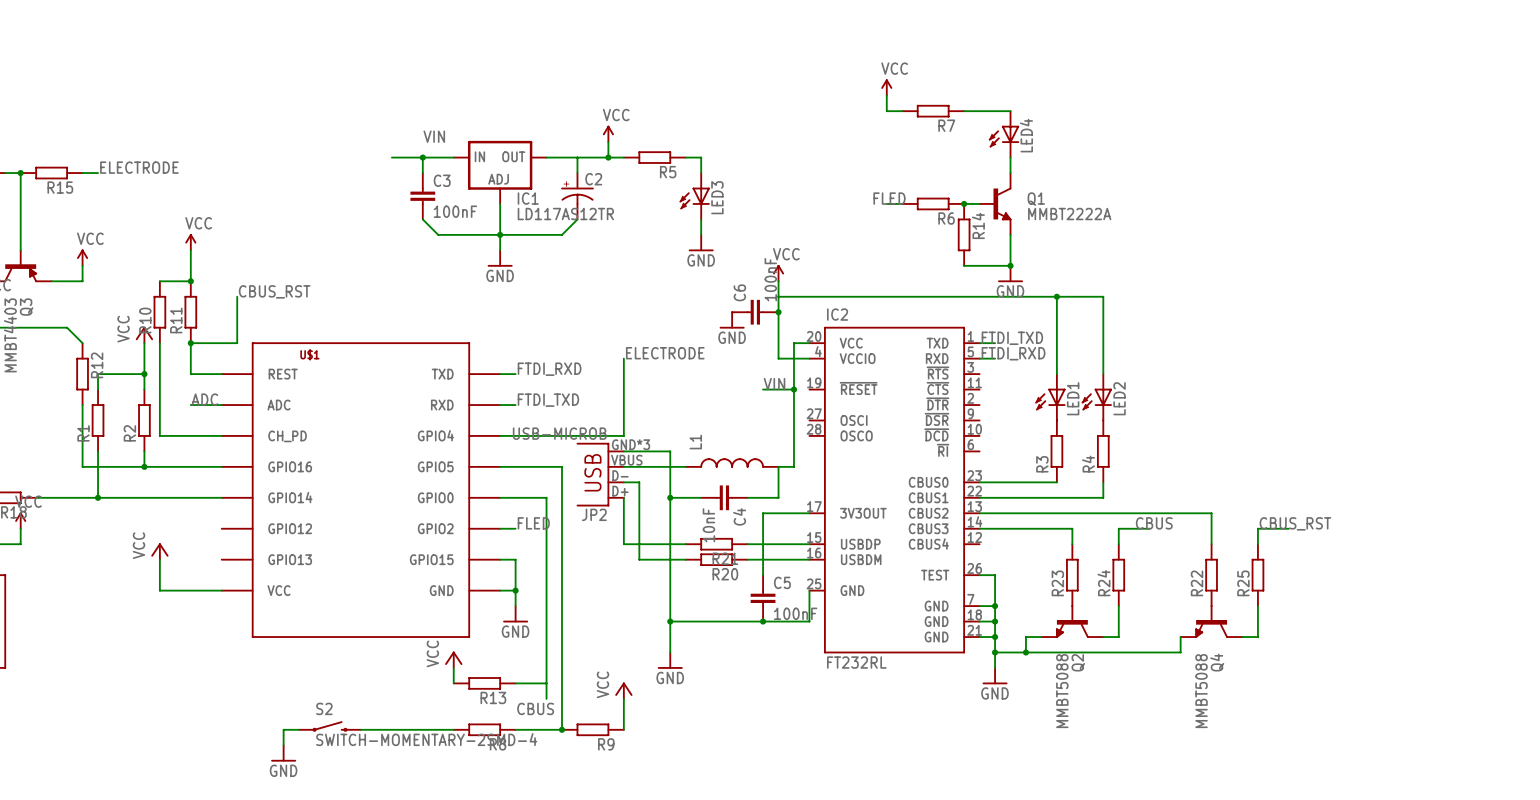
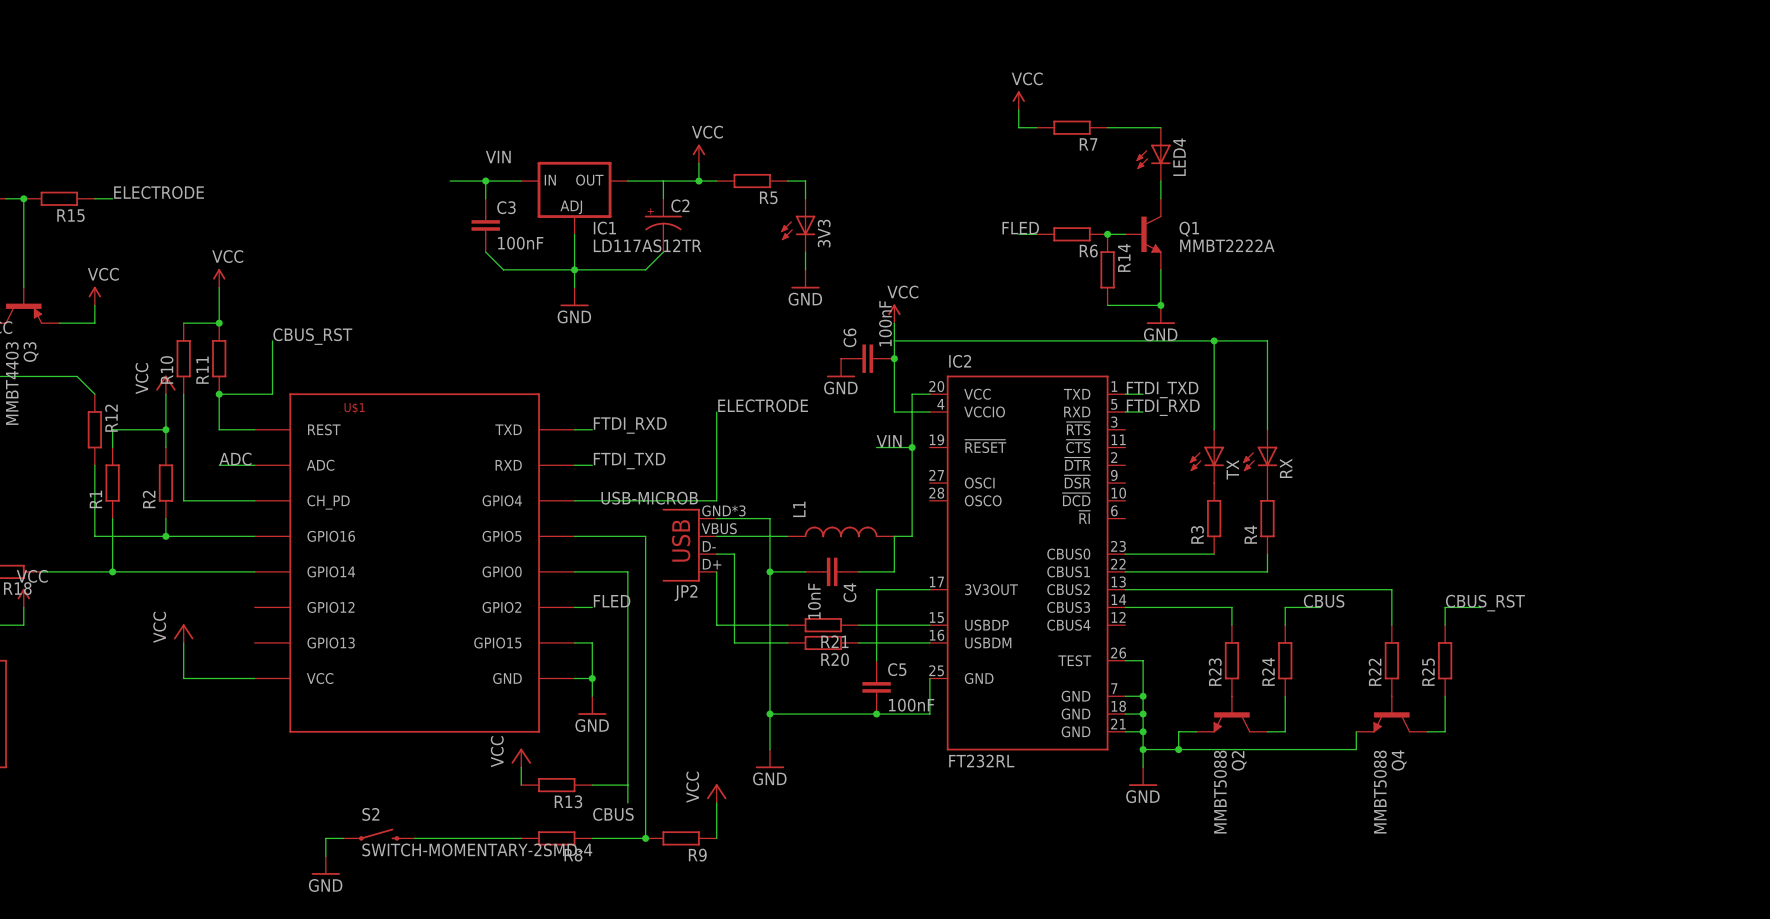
LED3 name: LED3 (717, 197) -> 3V3 (824, 233)
LED1 name: LED1 (1073, 398) -> TX (1232, 469)
LED2 name: LED2 (1119, 398) -> RX (1286, 468)

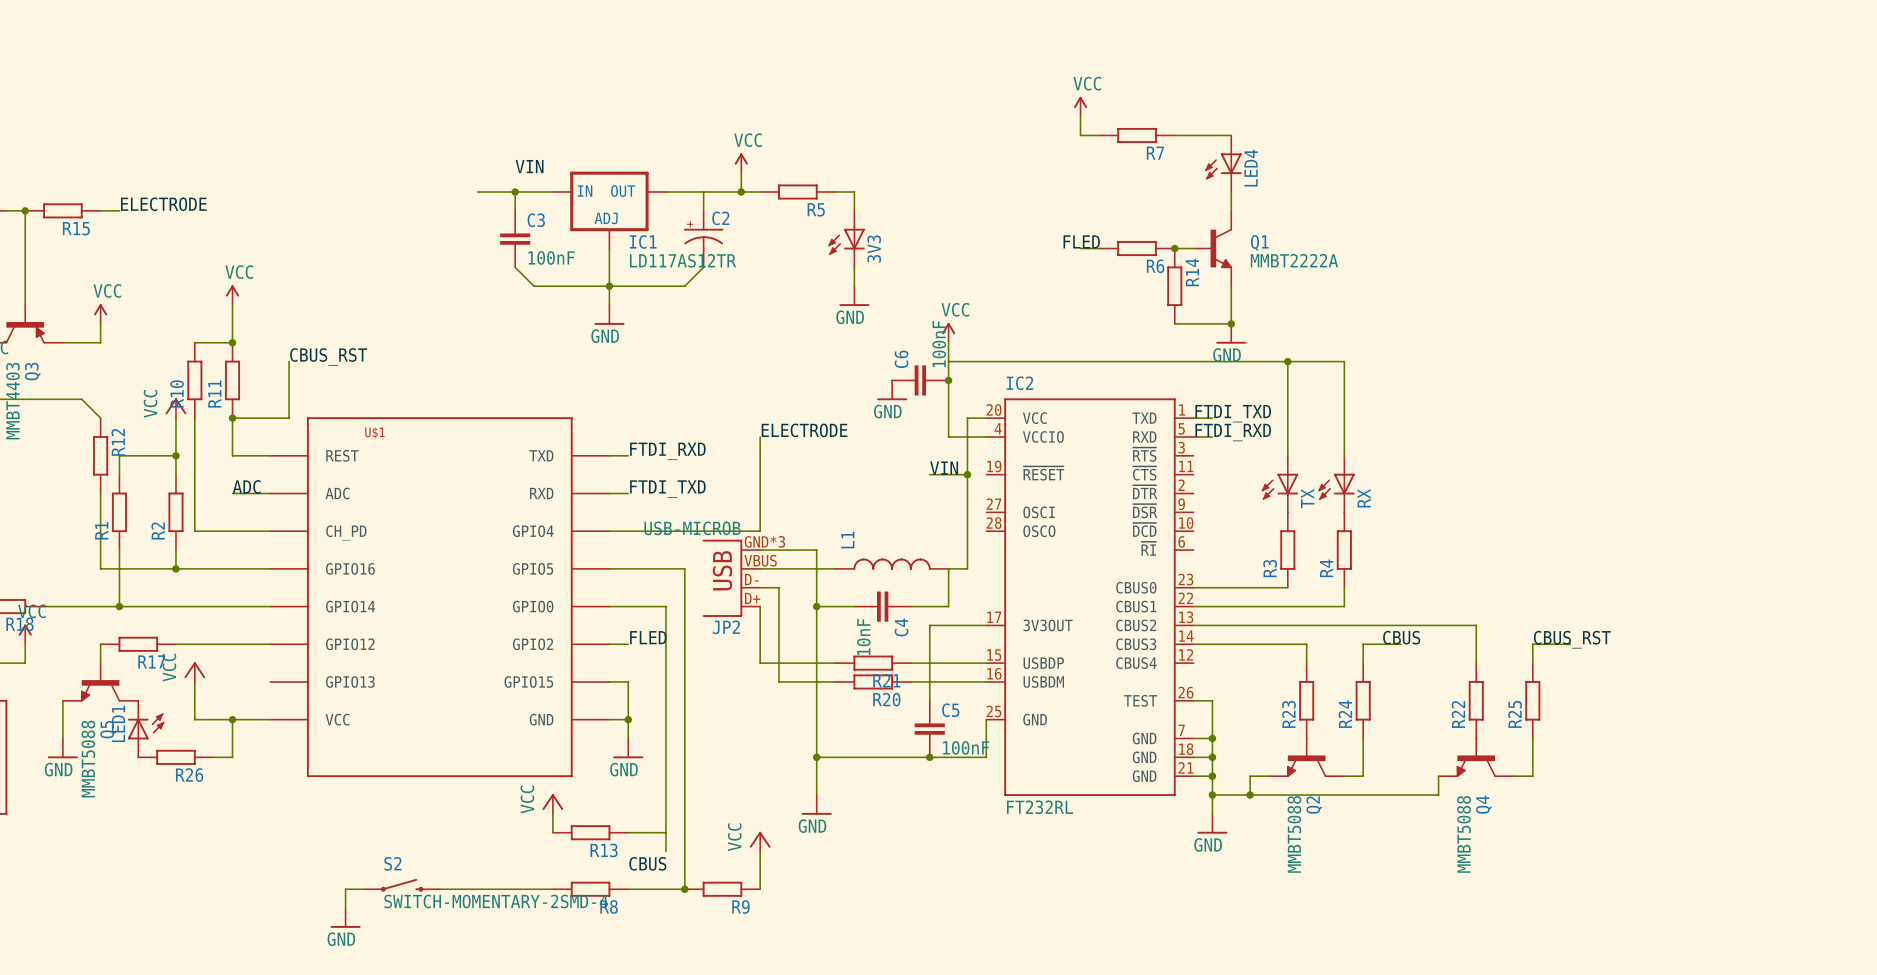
wire: none -> (100, 644) (100, 663)
R17: none -> (138, 644)
wire: none -> (175, 644) (270, 644)
Q5: none -> MMBT5088 (100, 682)
wire: none -> (62, 700) (62, 738)
wire: none -> (232, 719) (232, 757) (213, 757)
junction: none -> (232, 719)
LED1: none -> (146, 729)
power symbol: none -> GND (62, 748)
R26: none -> (175, 757)

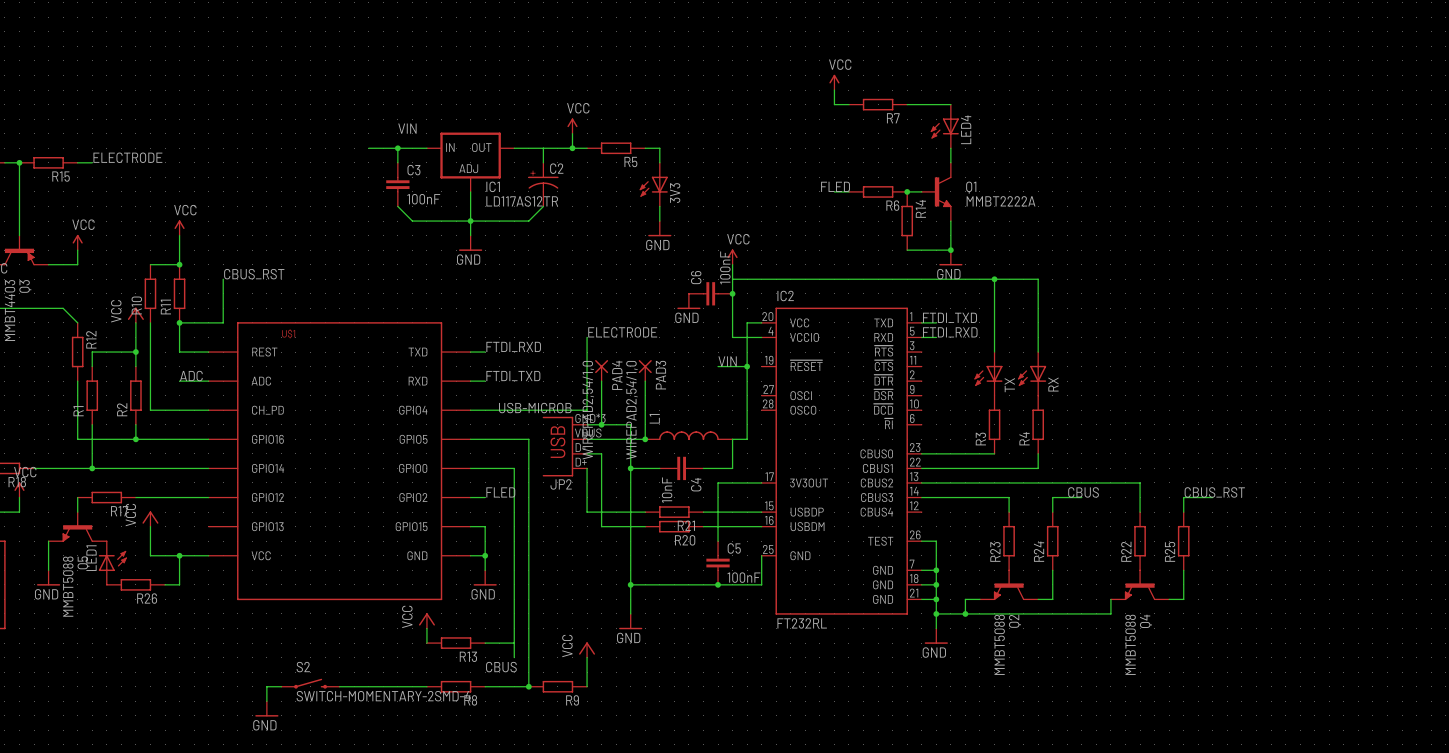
PAD4: none -> WIREPAD2,54/1,0 (601, 370)
PAD3: none -> WIREPAD2,54/1,0 (645, 370)
wire: none -> (601, 381) (601, 424)
wire: none -> (645, 381) (645, 439)
junction: none -> (601, 424)
junction: none -> (645, 439)

